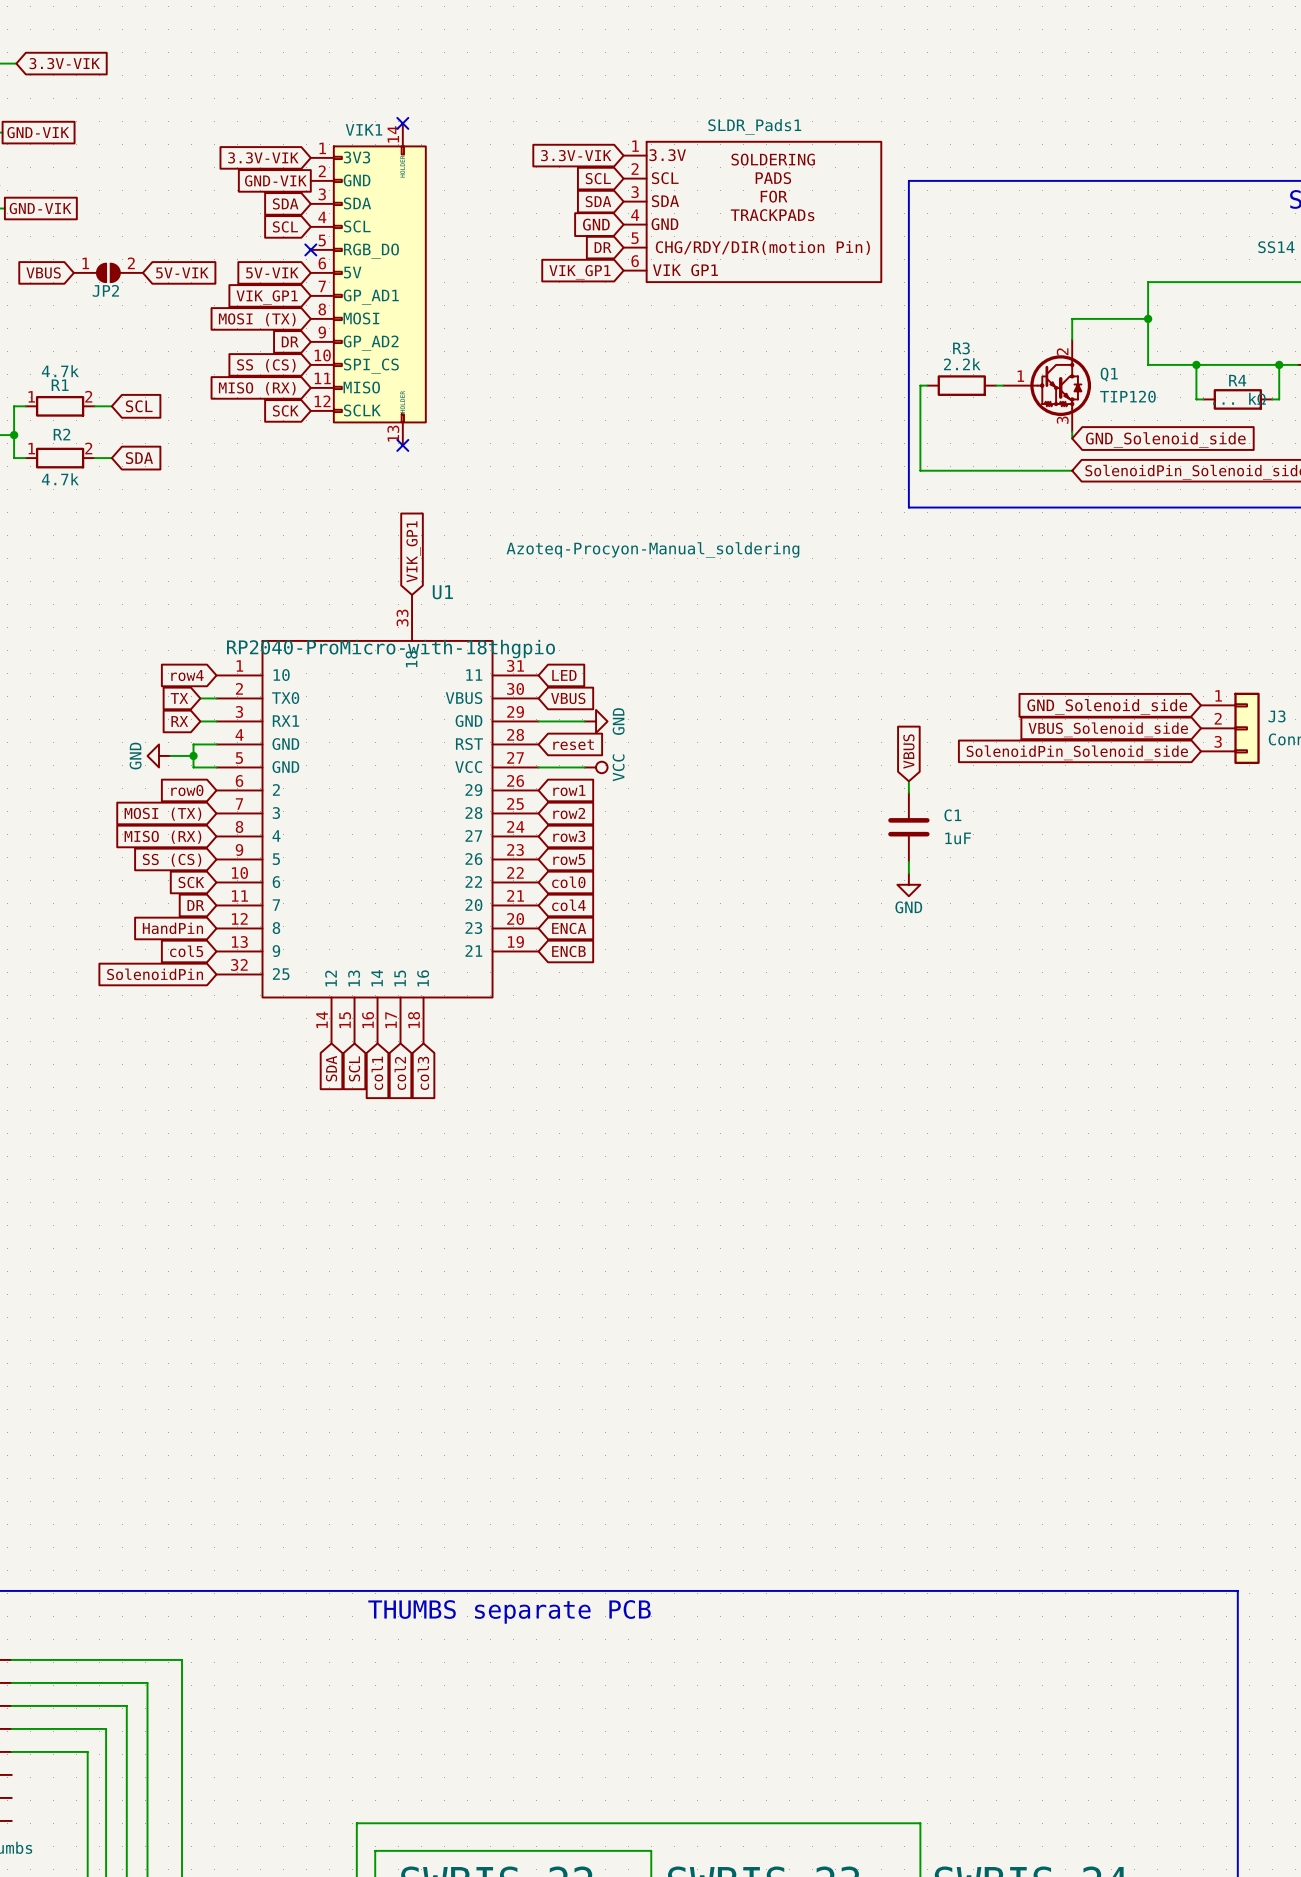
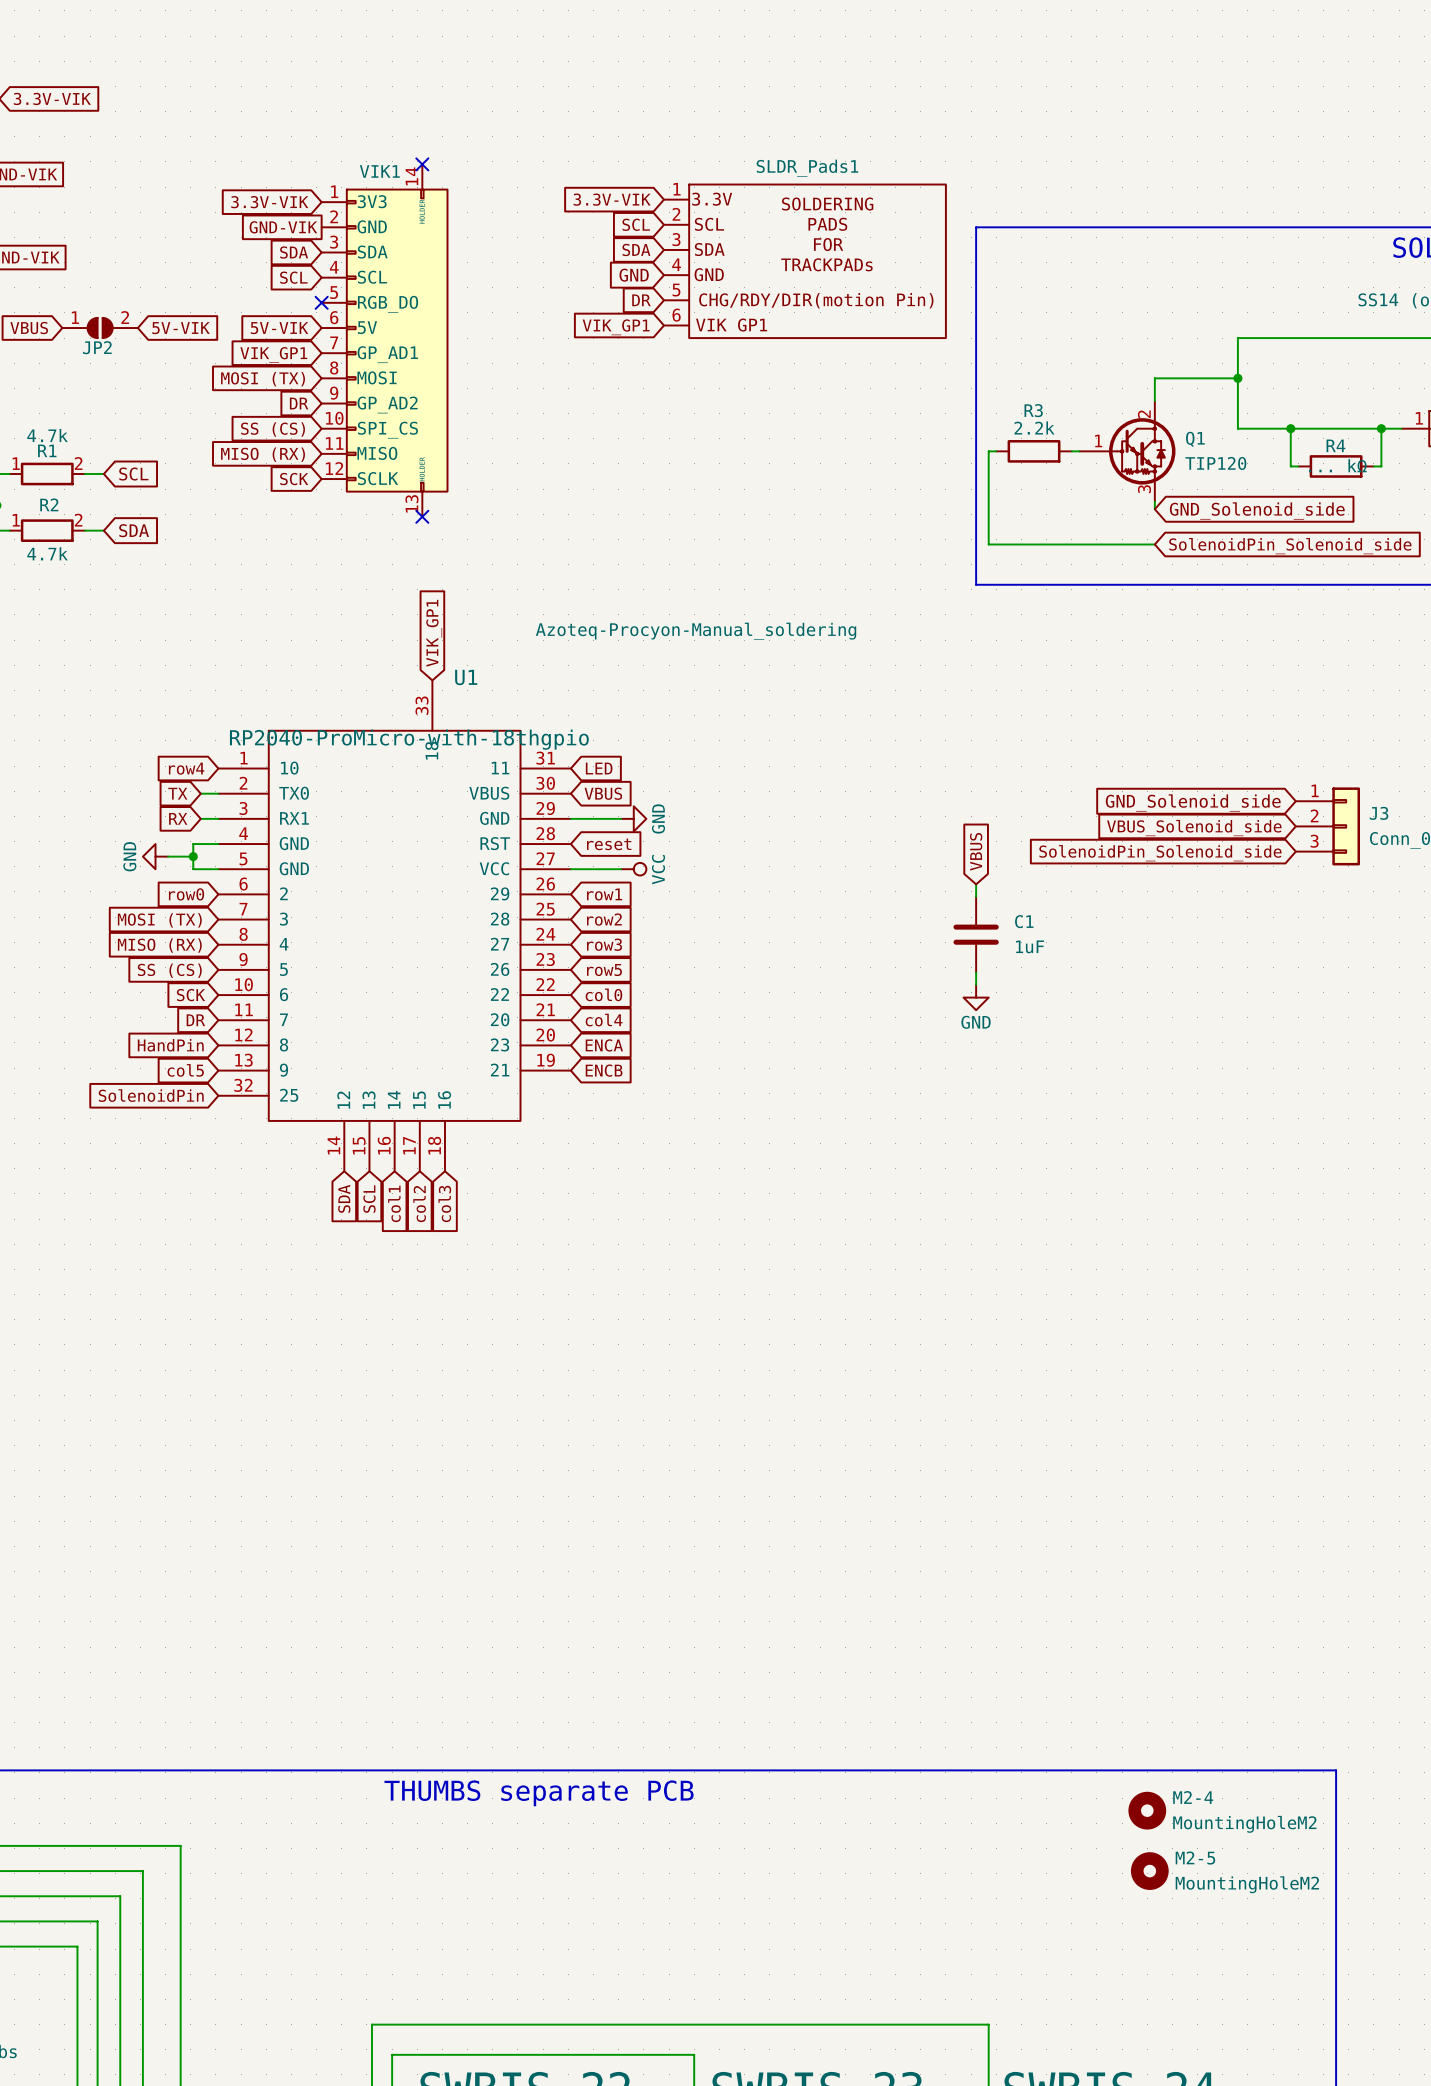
M2-4: none -> MountingHoleM2 (1147, 1810)
M2-5: none -> MountingHoleM2 (1149, 1871)

